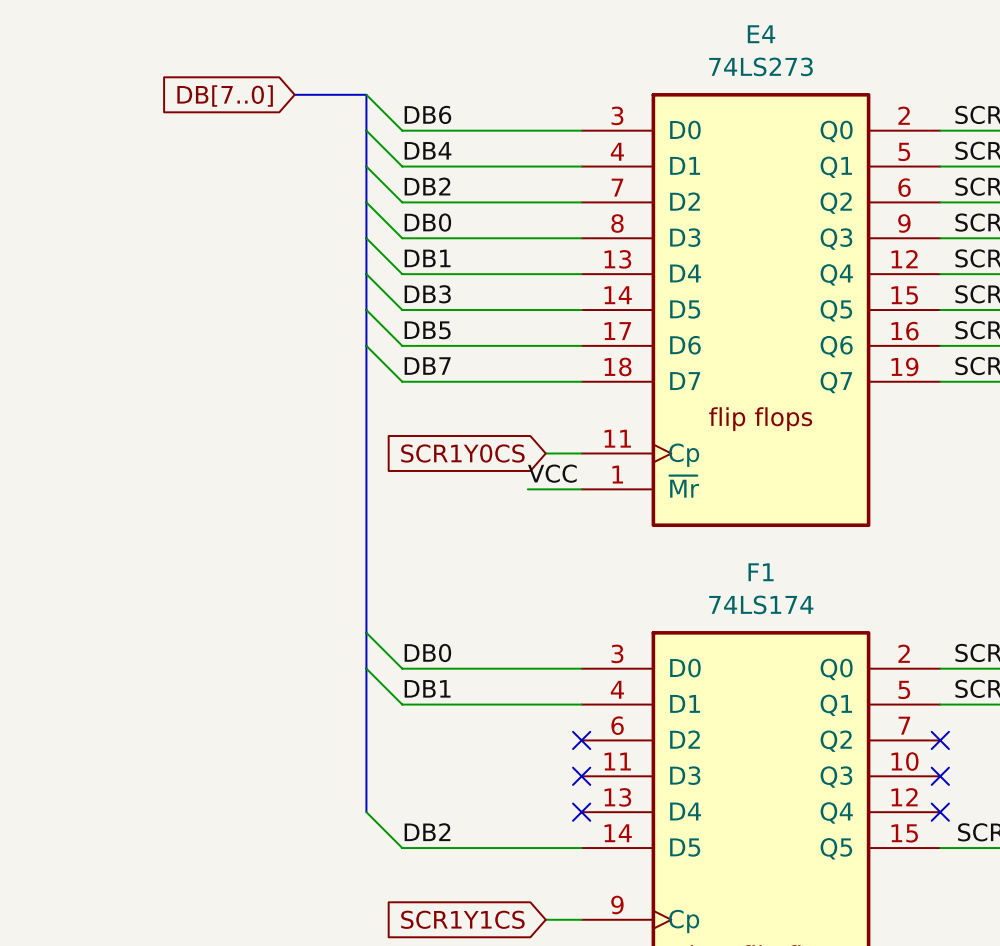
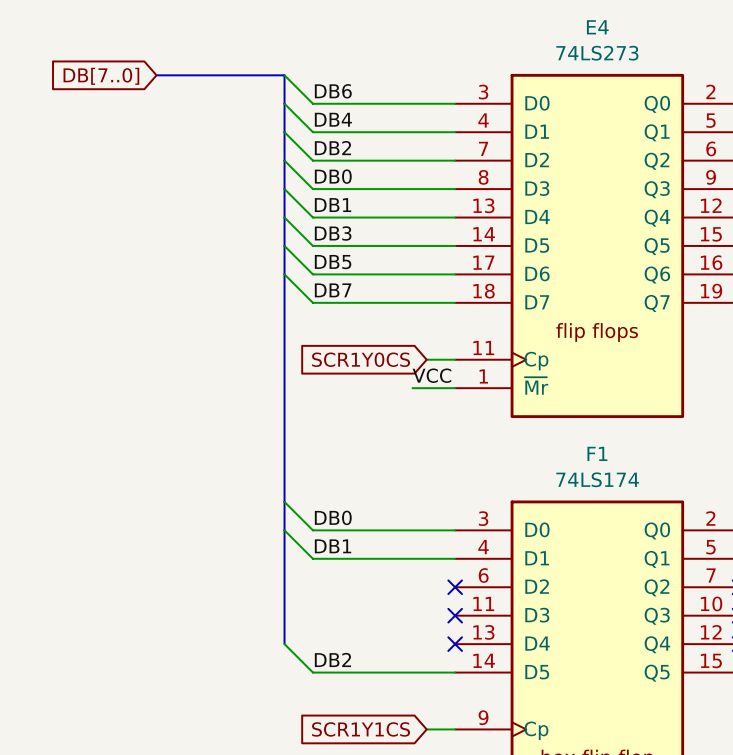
bus: none -> (156, 75) (227, 75)
global label position: DB[7..0] (225, 96) -> DB[7..0] (101, 76)

